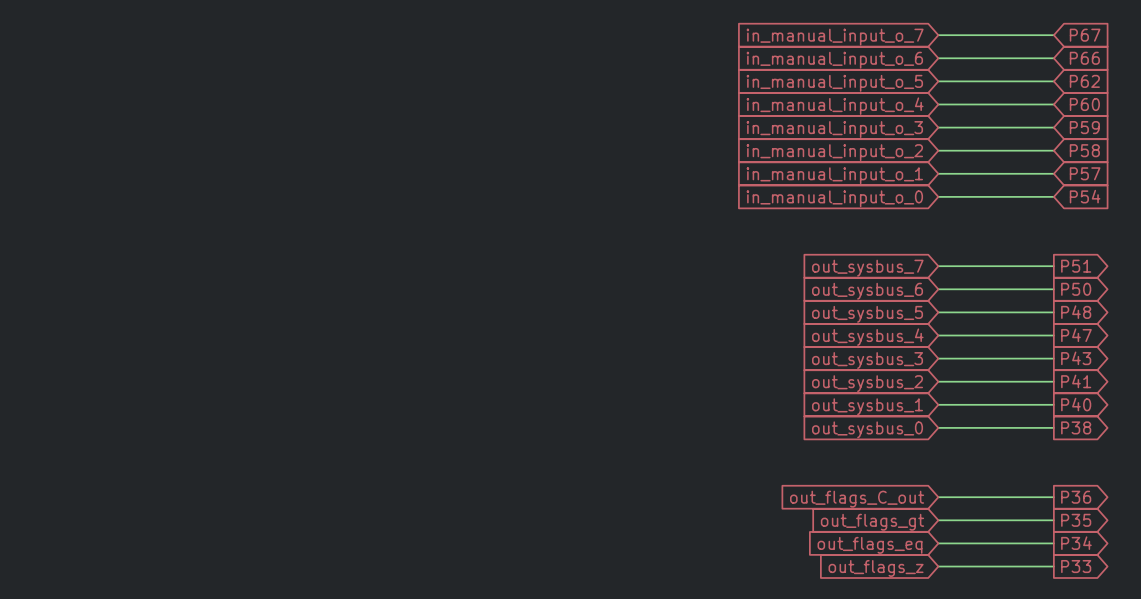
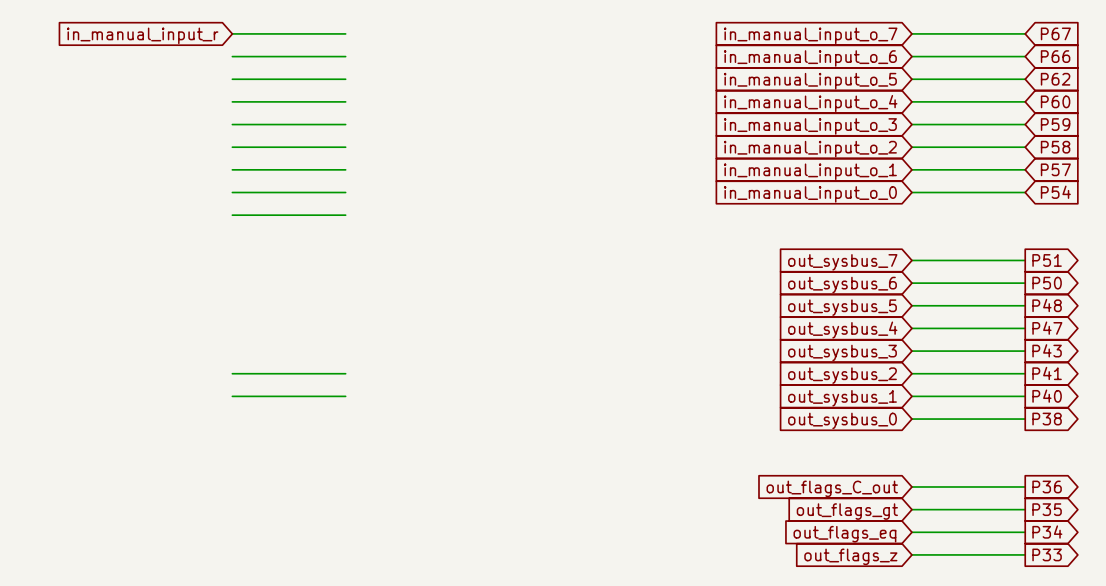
wire: none -> (232, 33) (345, 33)
global label: none -> in_manual_input_r (142, 35)
wire: none -> (232, 56) (345, 56)
wire: none -> (232, 79) (345, 79)
wire: none -> (232, 101) (345, 101)
wire: none -> (232, 124) (345, 124)
wire: none -> (232, 147) (345, 147)
wire: none -> (232, 169) (345, 169)
wire: none -> (232, 192) (345, 192)
wire: none -> (232, 215) (345, 215)
wire: none -> (232, 373) (345, 373)
wire: none -> (232, 396) (345, 396)

